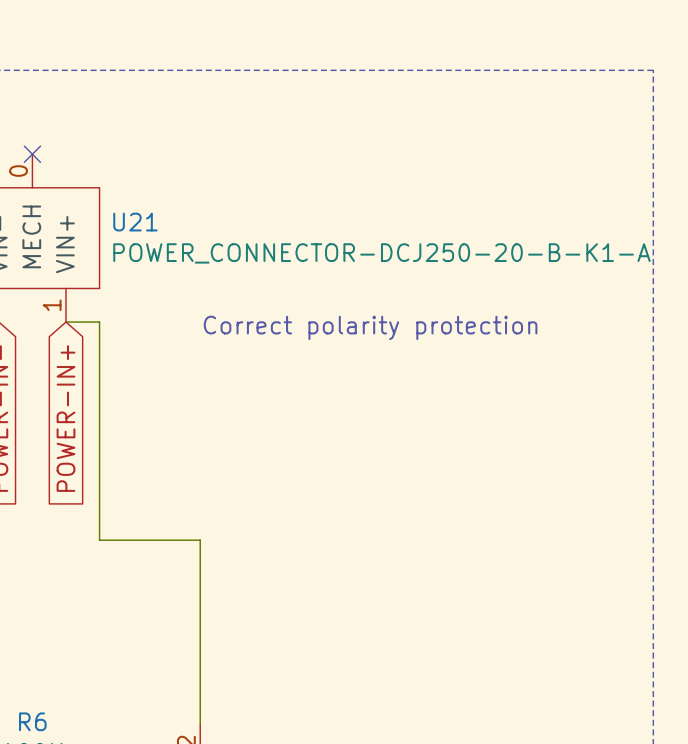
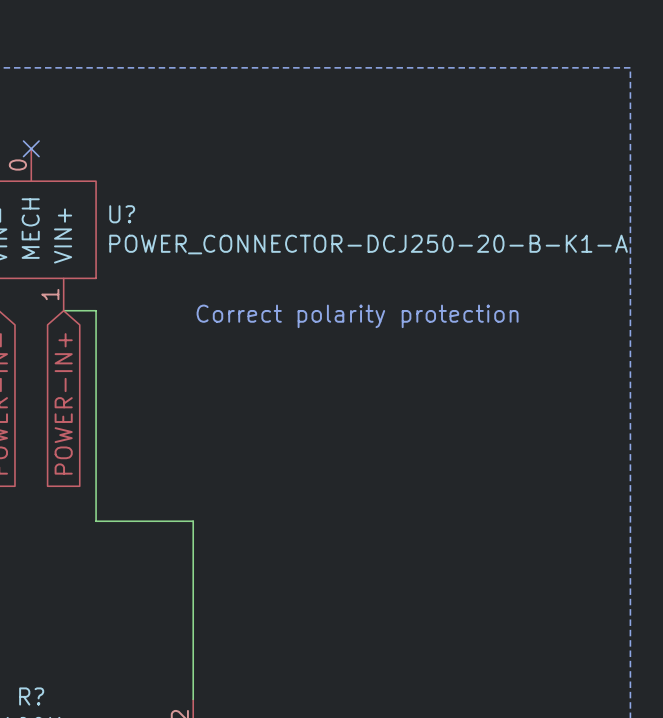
U21 name: U21 (135, 222) -> U? (122, 214)
R6 name: R6 (32, 721) -> R? (31, 696)

